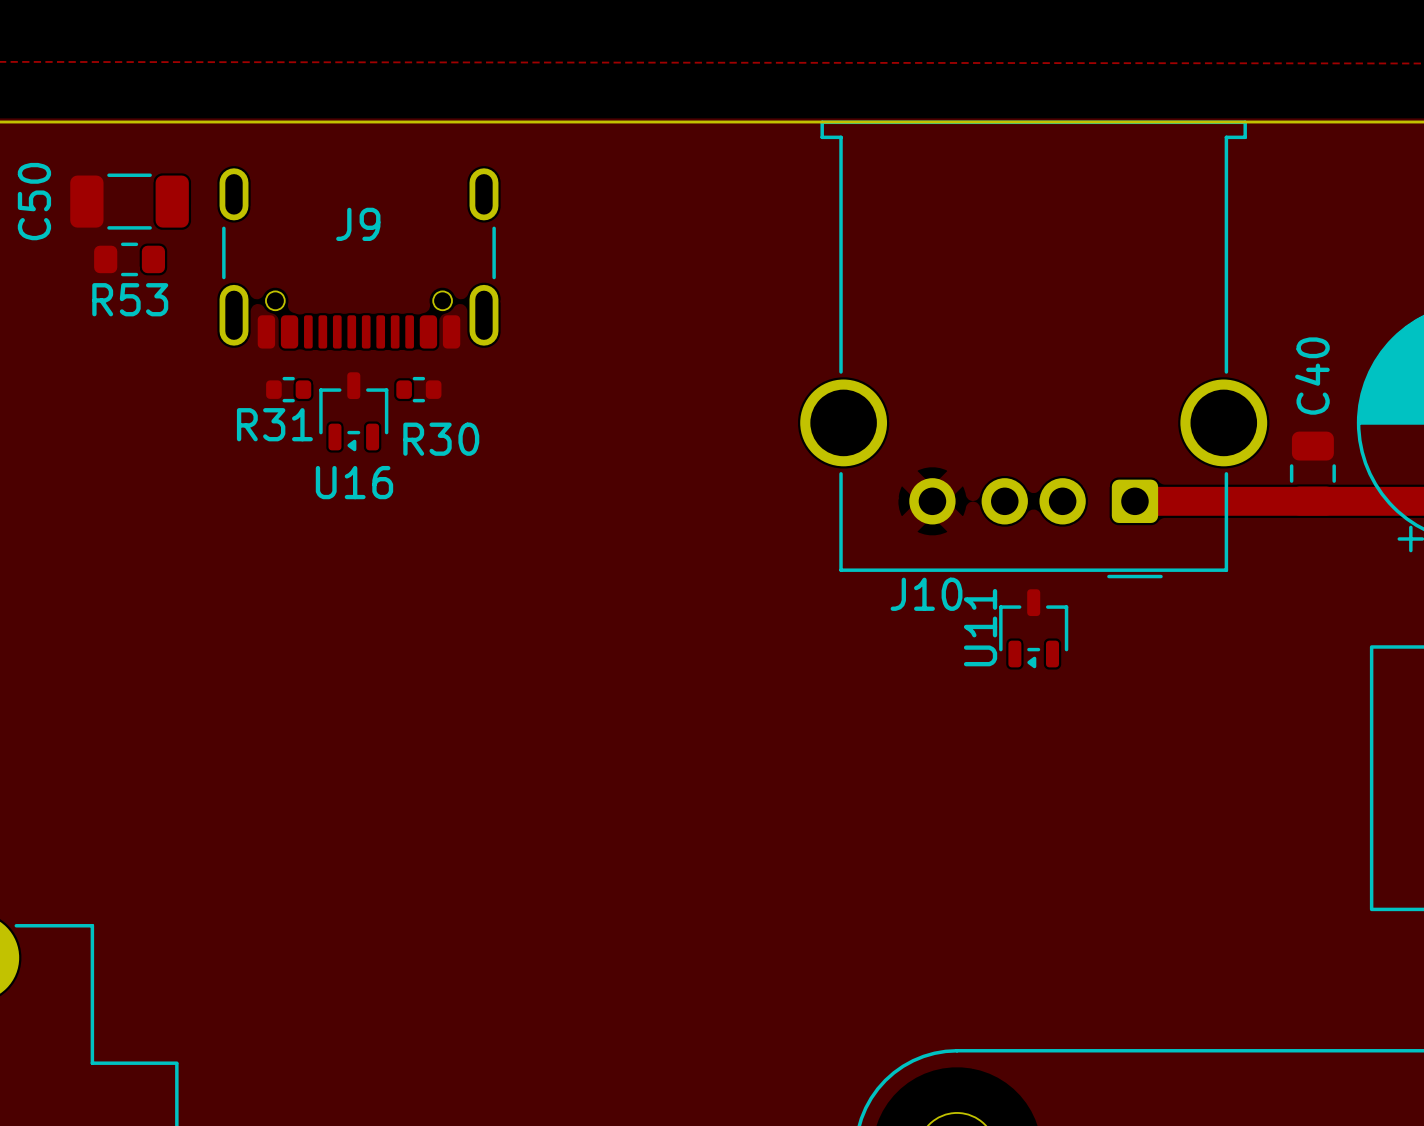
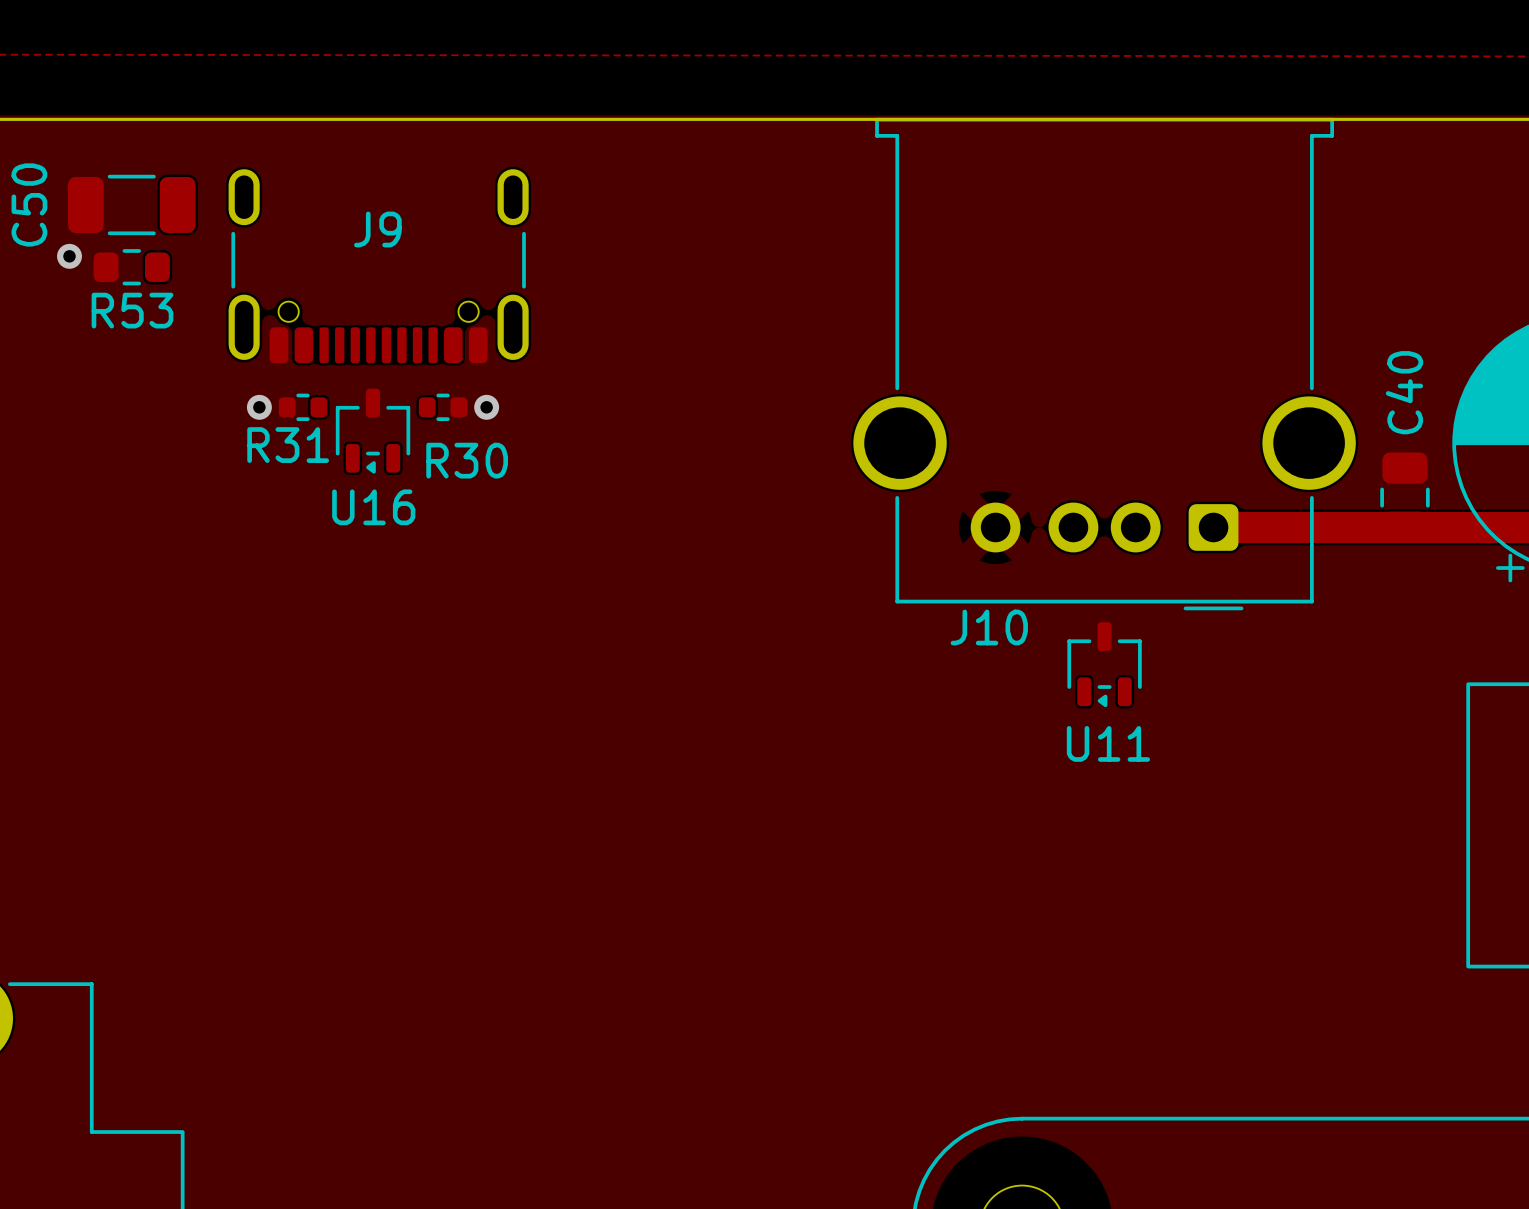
via: none -> (69, 256)
via: none -> (259, 407)
via: none -> (486, 407)
U11 name rotation: 0° (980, 627) -> 90° clockwise (1108, 743)

